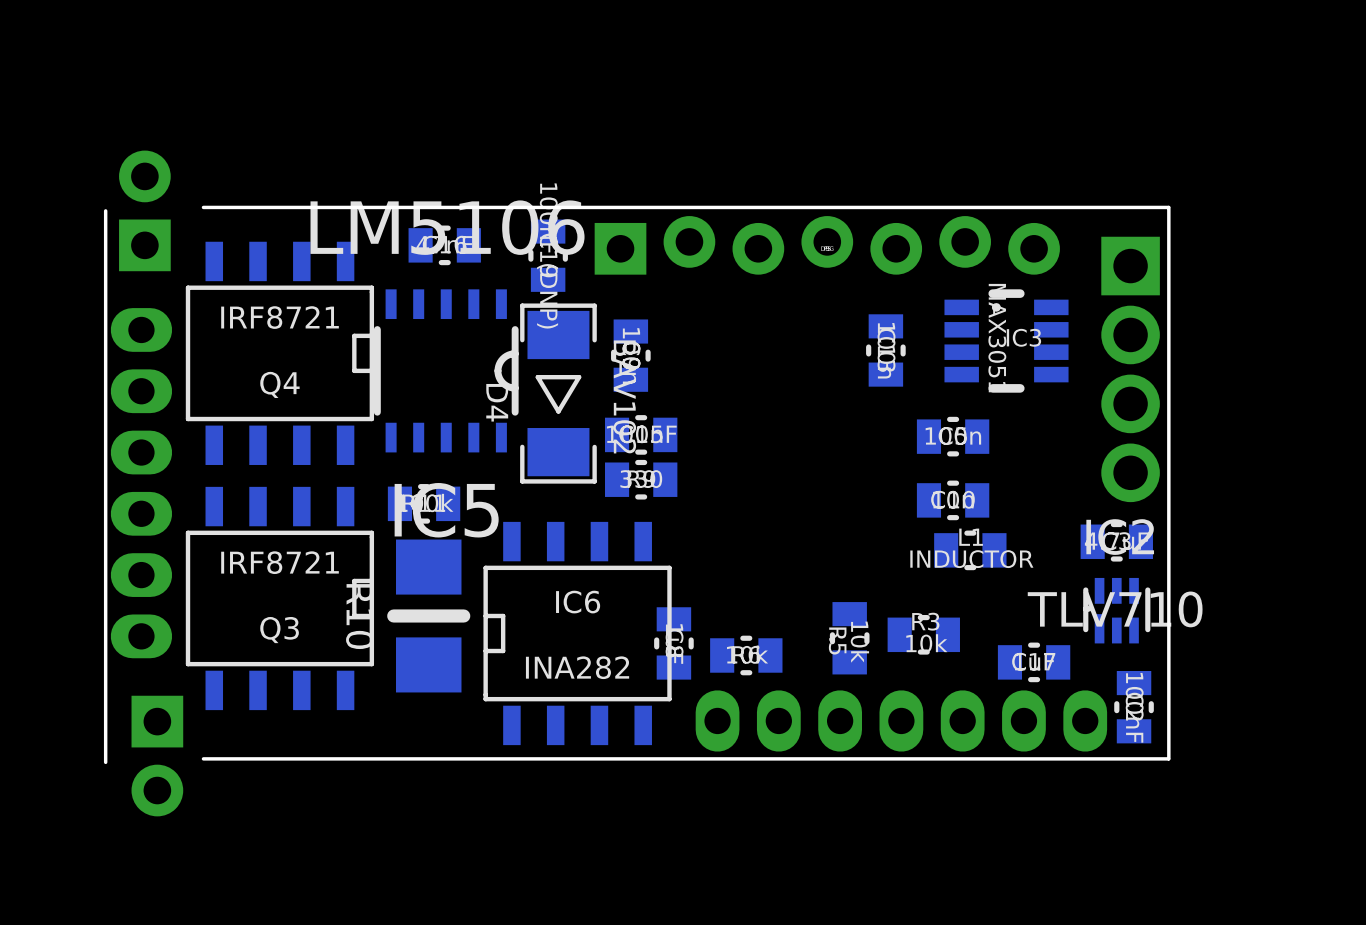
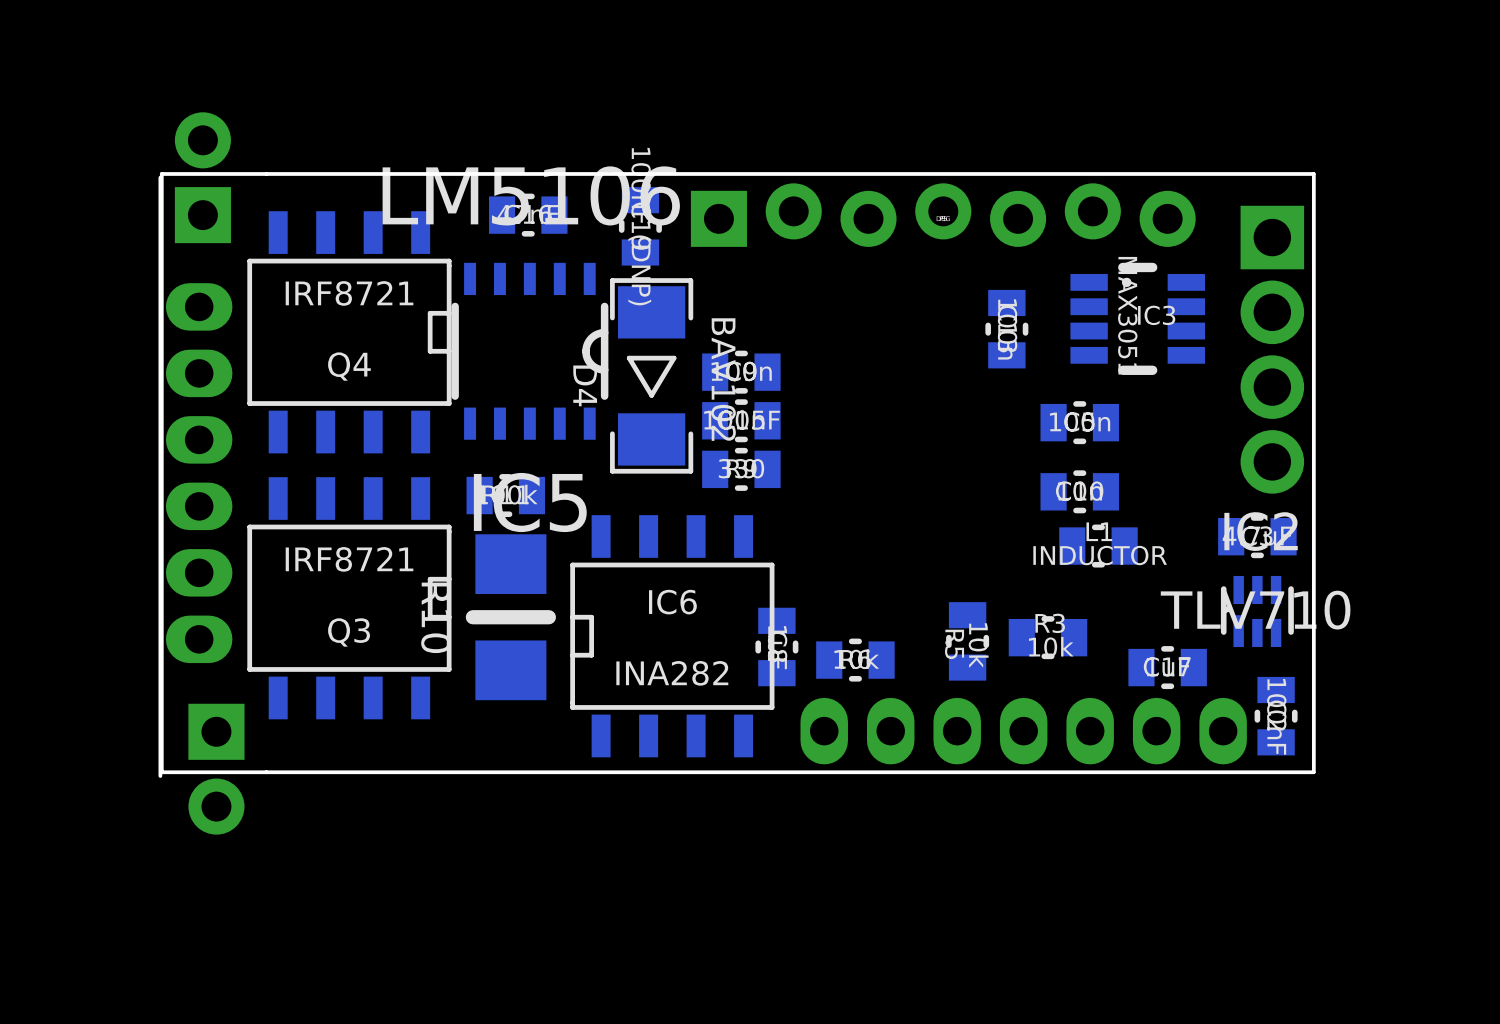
board edge: none -> (266, 173) (161, 173) (161, 772) (266, 772)
part rotation: 0° (630, 355) -> 90° clockwise (741, 372)

